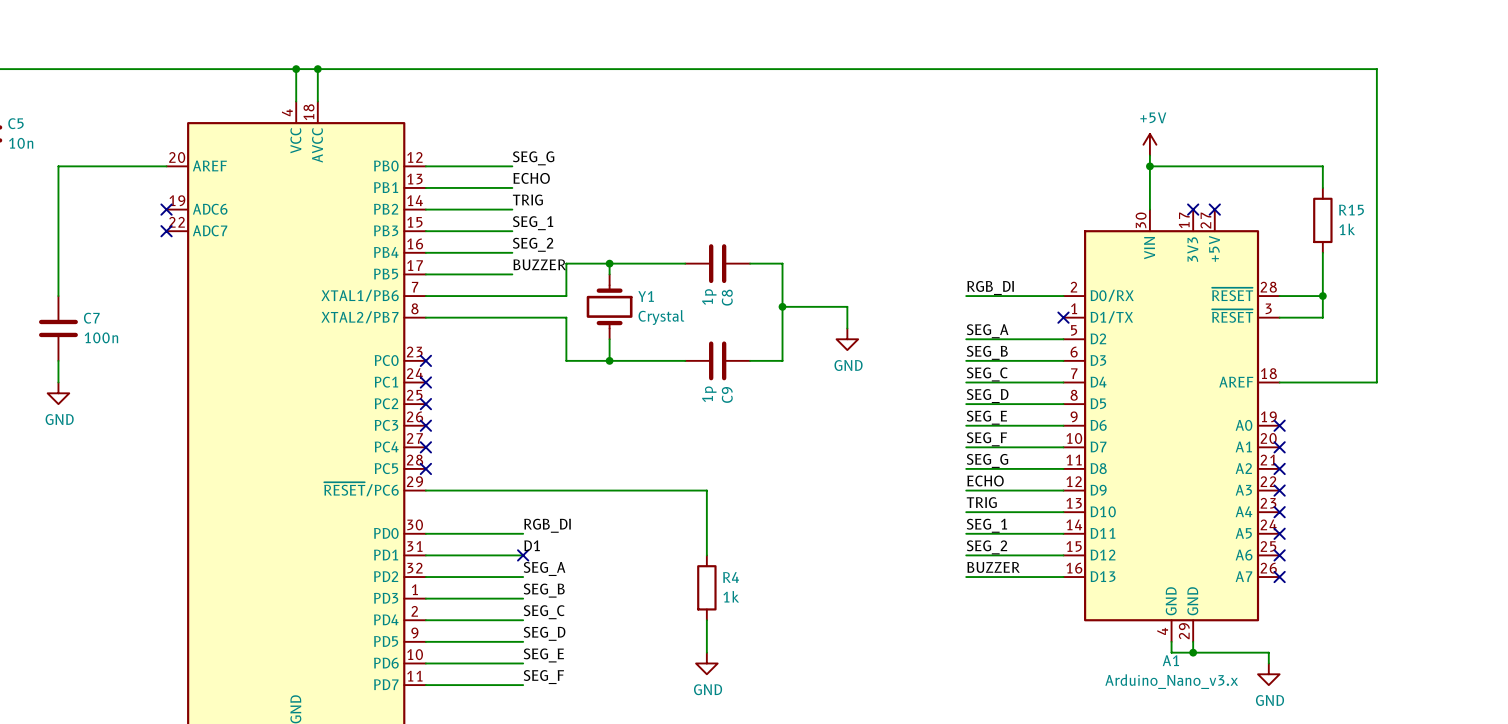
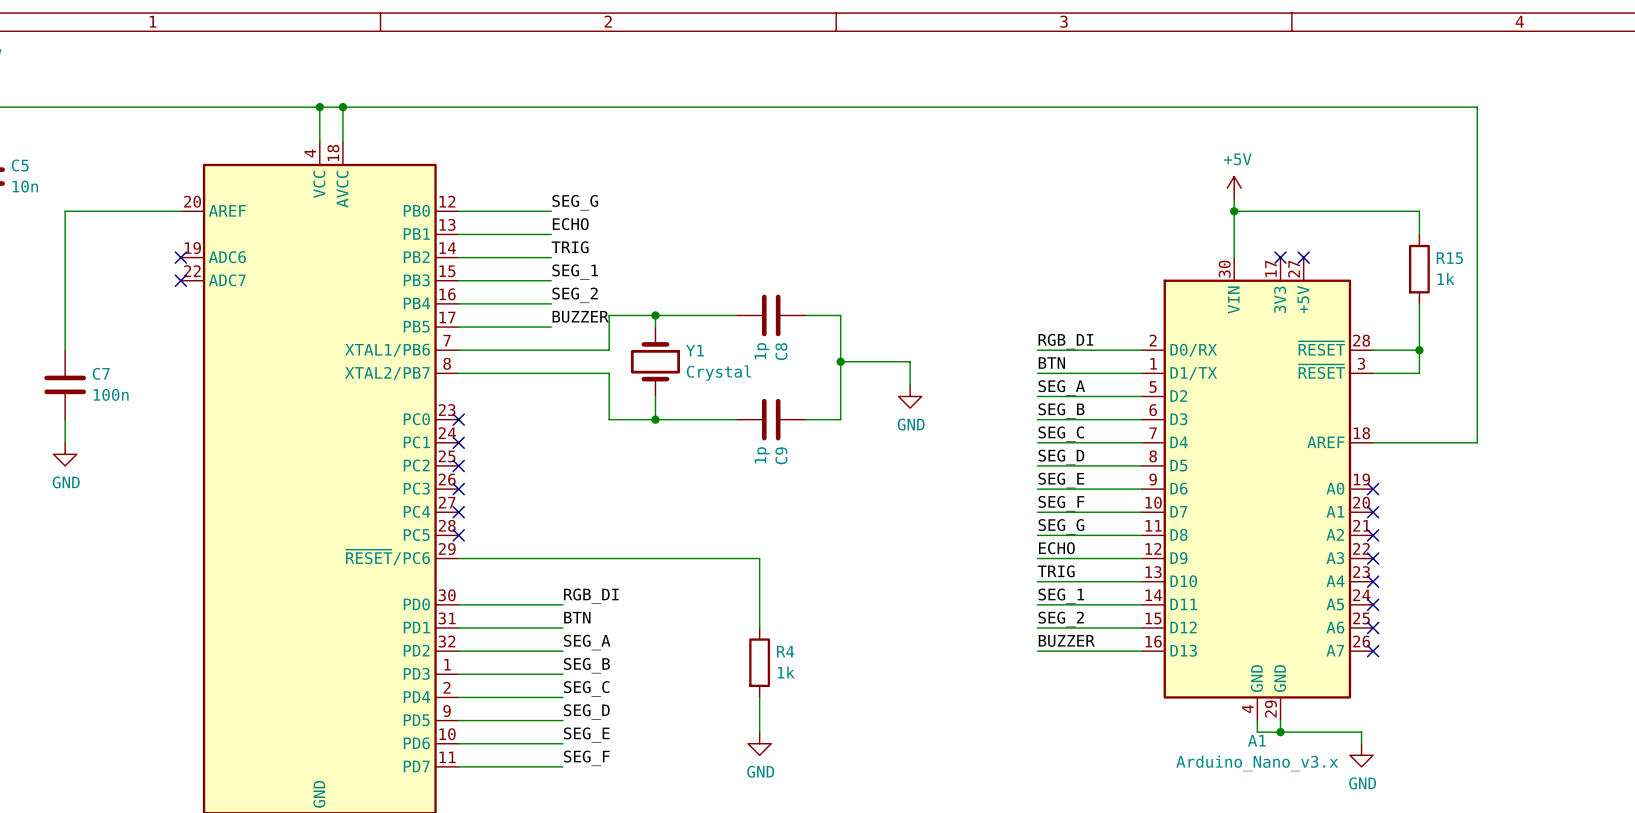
label: none -> BTN (1051, 363)
wire: none -> (1037, 373) (1141, 373)
no-connect mark: (1063, 317) -> none
label: D1 (532, 545) -> BTN (577, 617)
no-connect mark: (523, 555) -> none

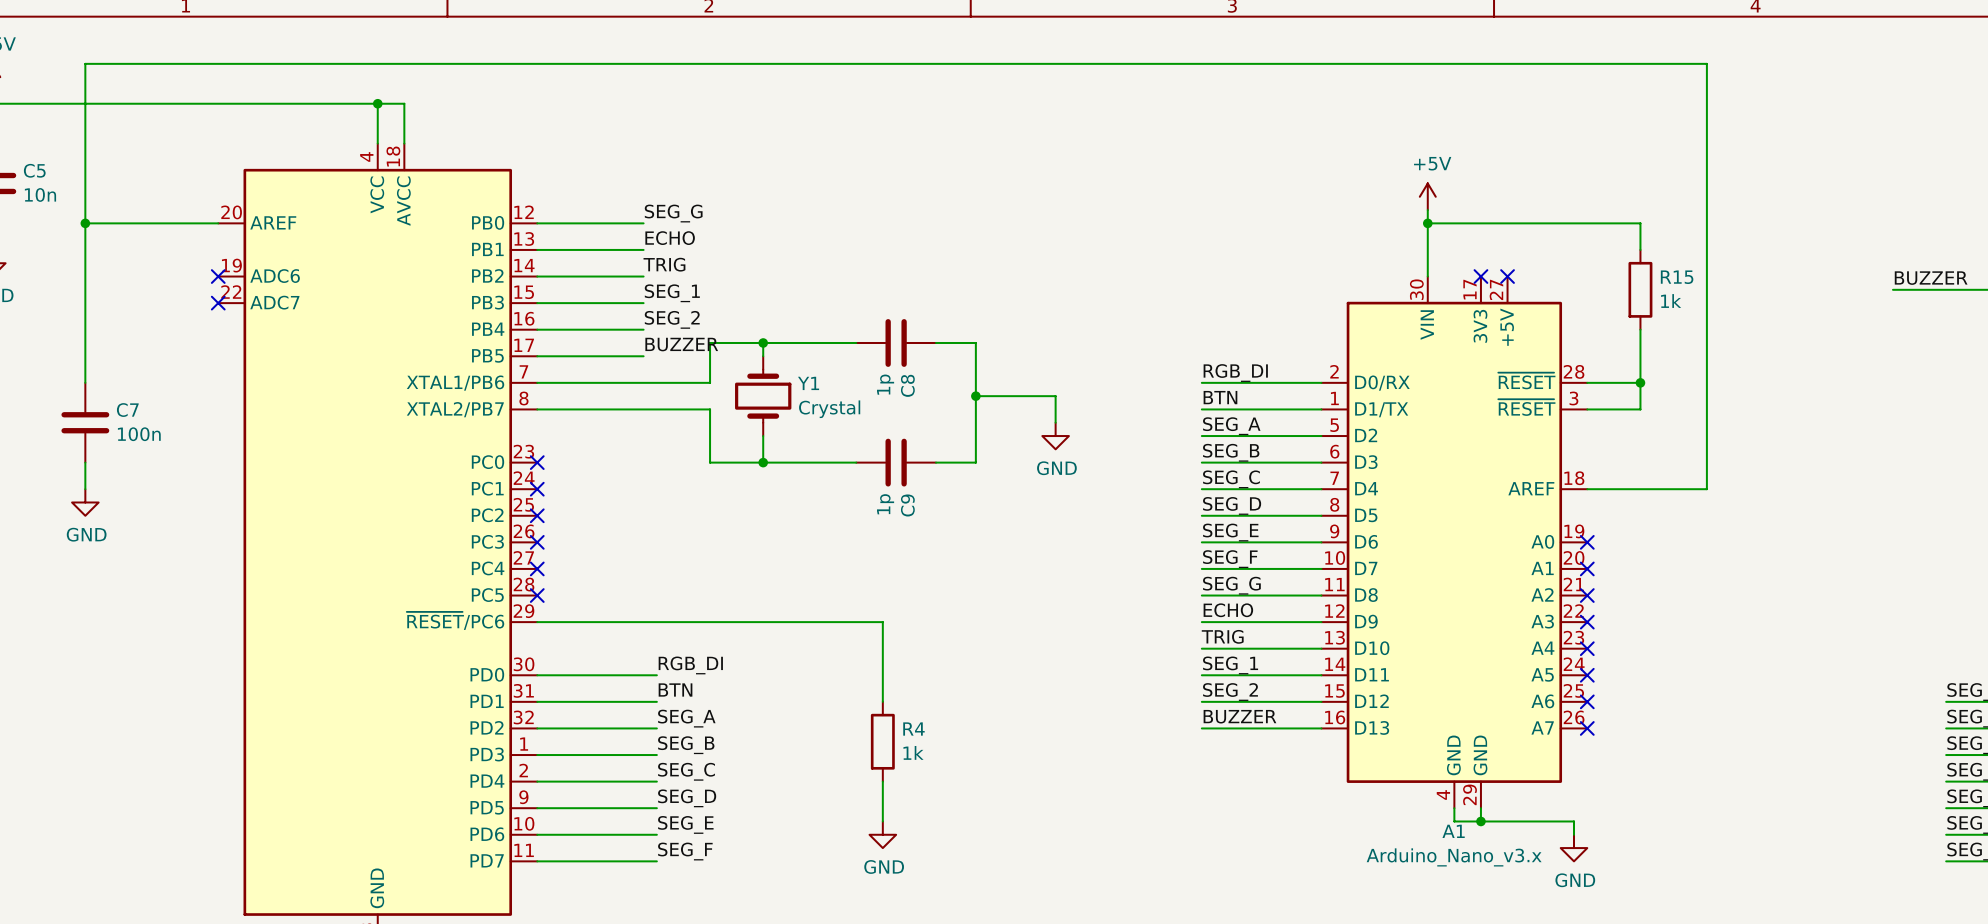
wire: (342, 107) (1477, 107) -> (85, 223) (85, 63) (1706, 63) (1706, 103)
junction: (342, 107) -> none
junction: none -> (85, 223)

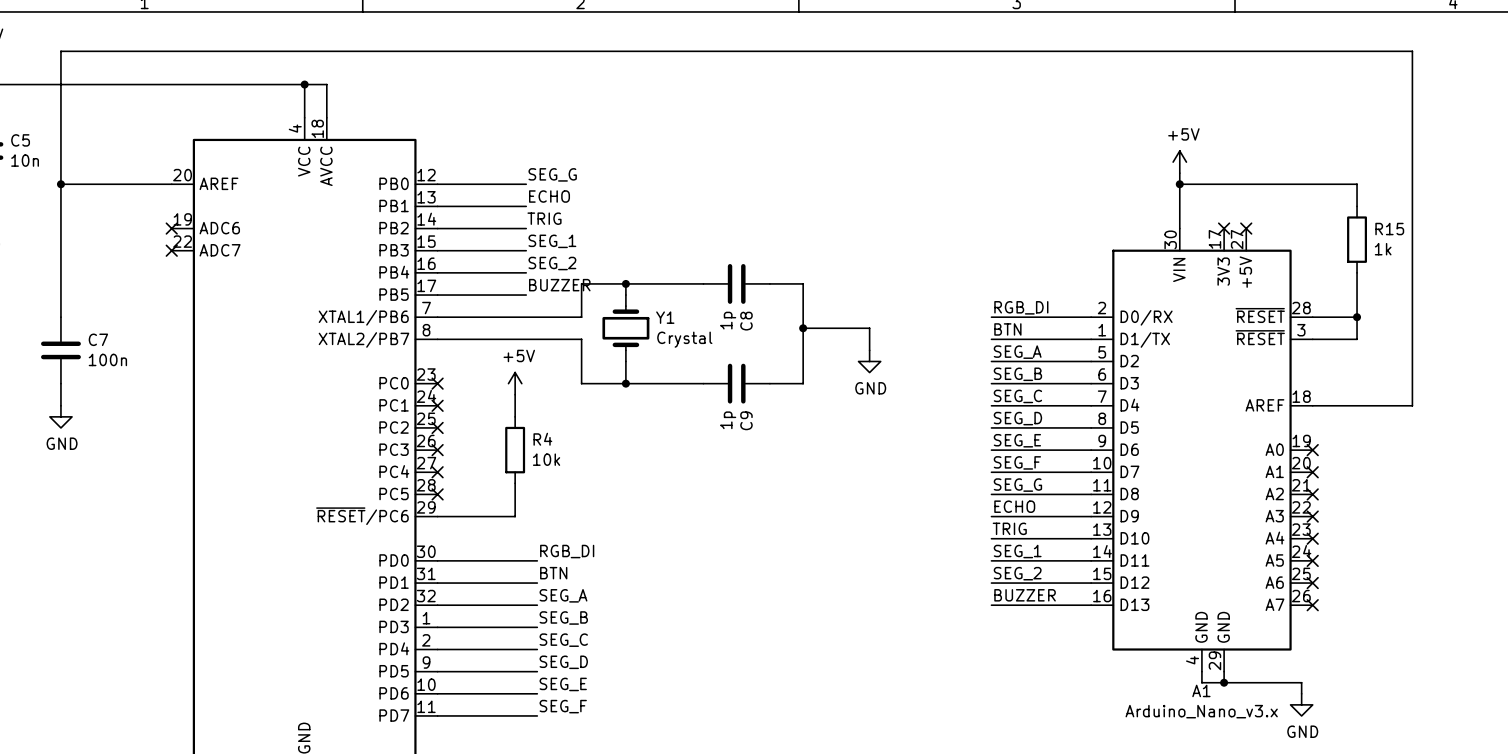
power symbol: none -> +5V (515, 383)
wire: none -> (515, 394) (515, 416)
wire: (630, 622) (882, 622) (882, 701) -> (515, 516) (515, 483)
R4 position: (882, 741) -> (515, 450)
R4 value: 1k (913, 752) -> 10k (546, 459)
wire: (882, 781) (882, 821) -> none
power symbol: GND (882, 834) -> none

